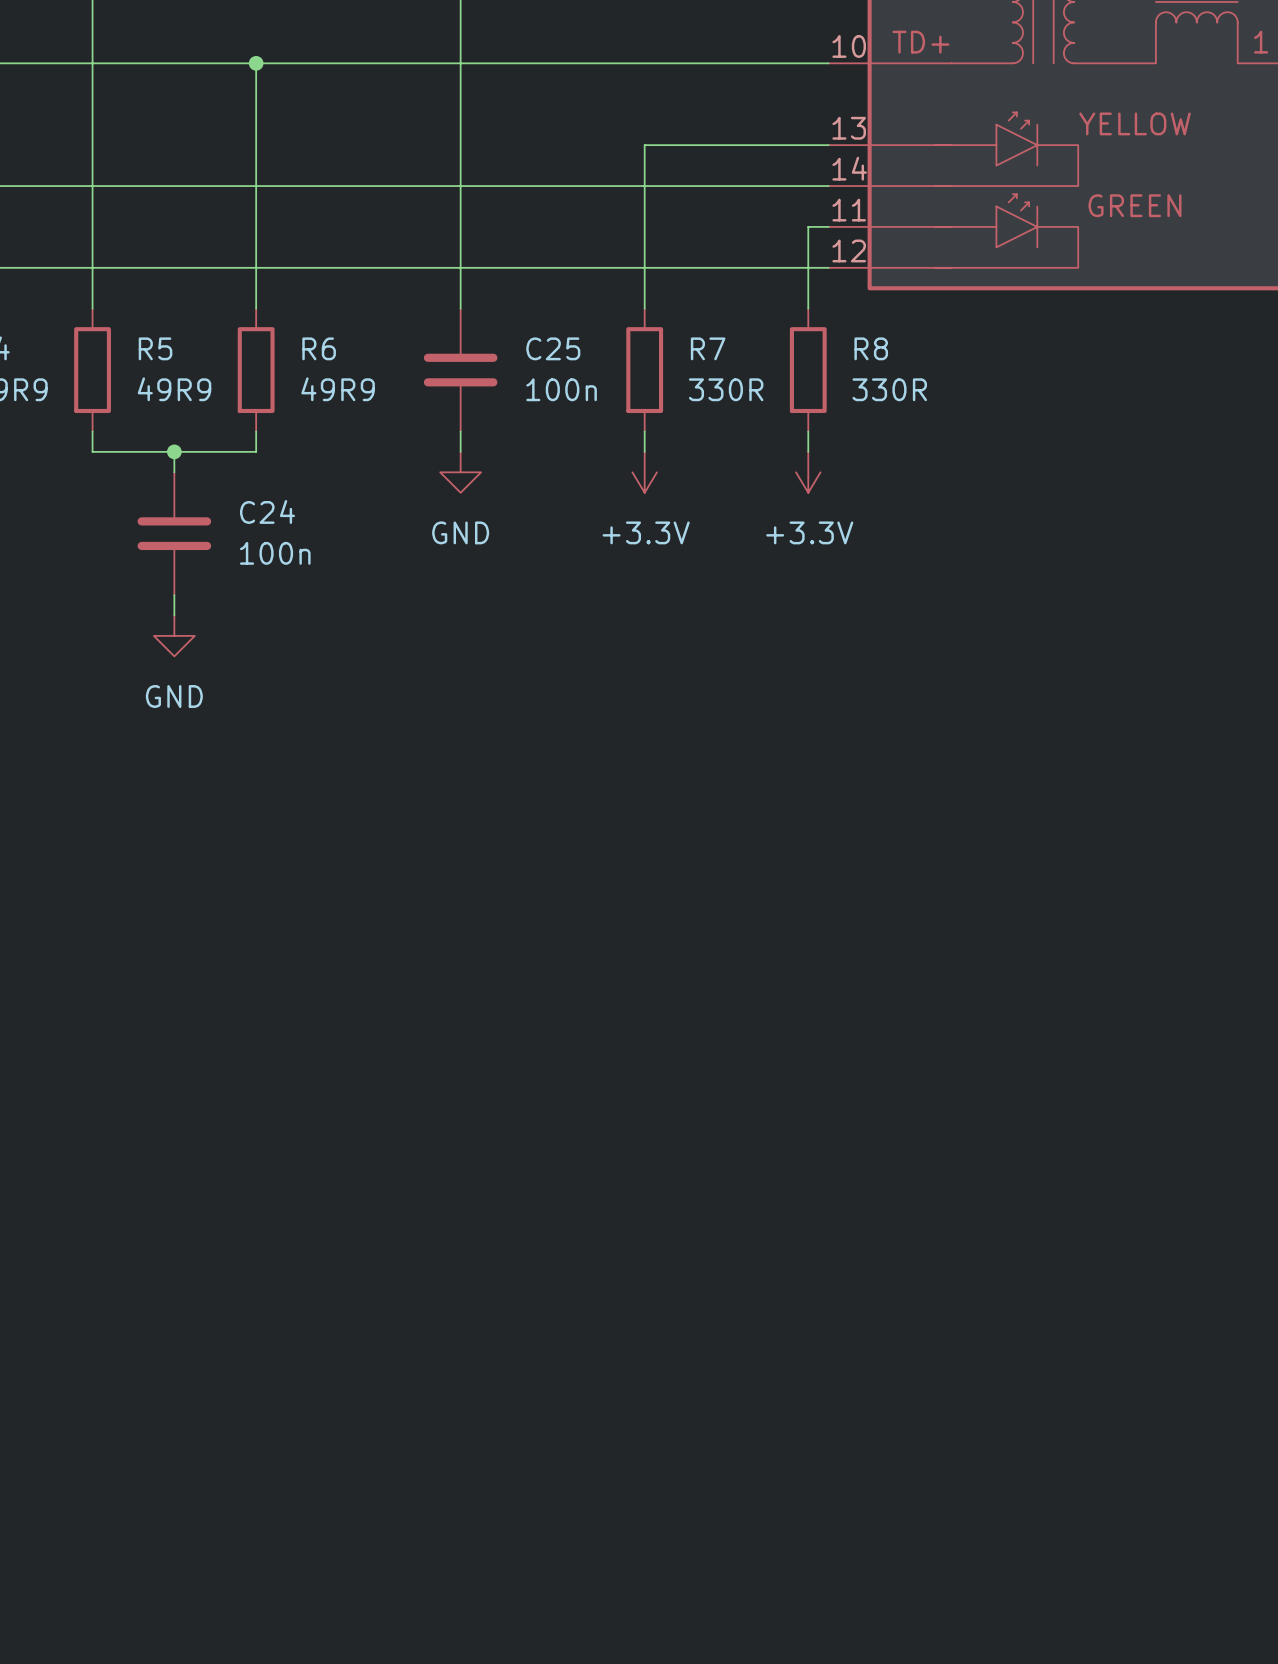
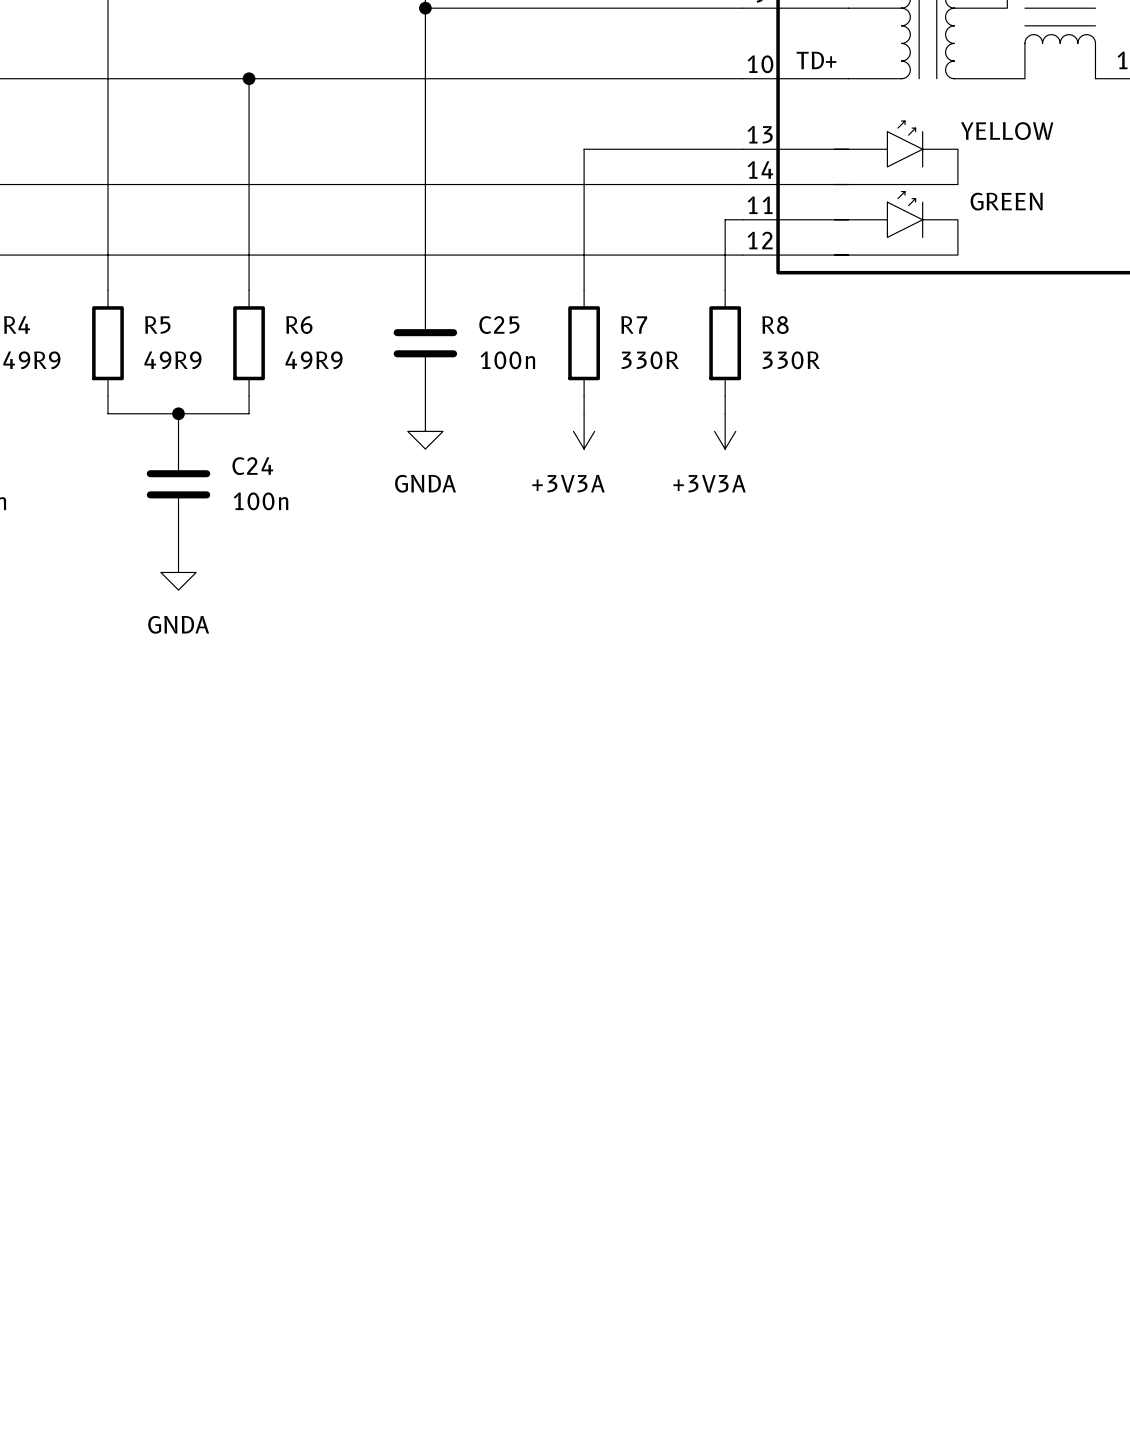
power symbol: GND (460, 472) -> GNDA (425, 431)
power symbol: +3.3V (644, 472) -> +3V3A (584, 431)
power symbol: +3.3V (808, 472) -> +3V3A (725, 431)
power symbol: GND (174, 635) -> GNDA (178, 572)

